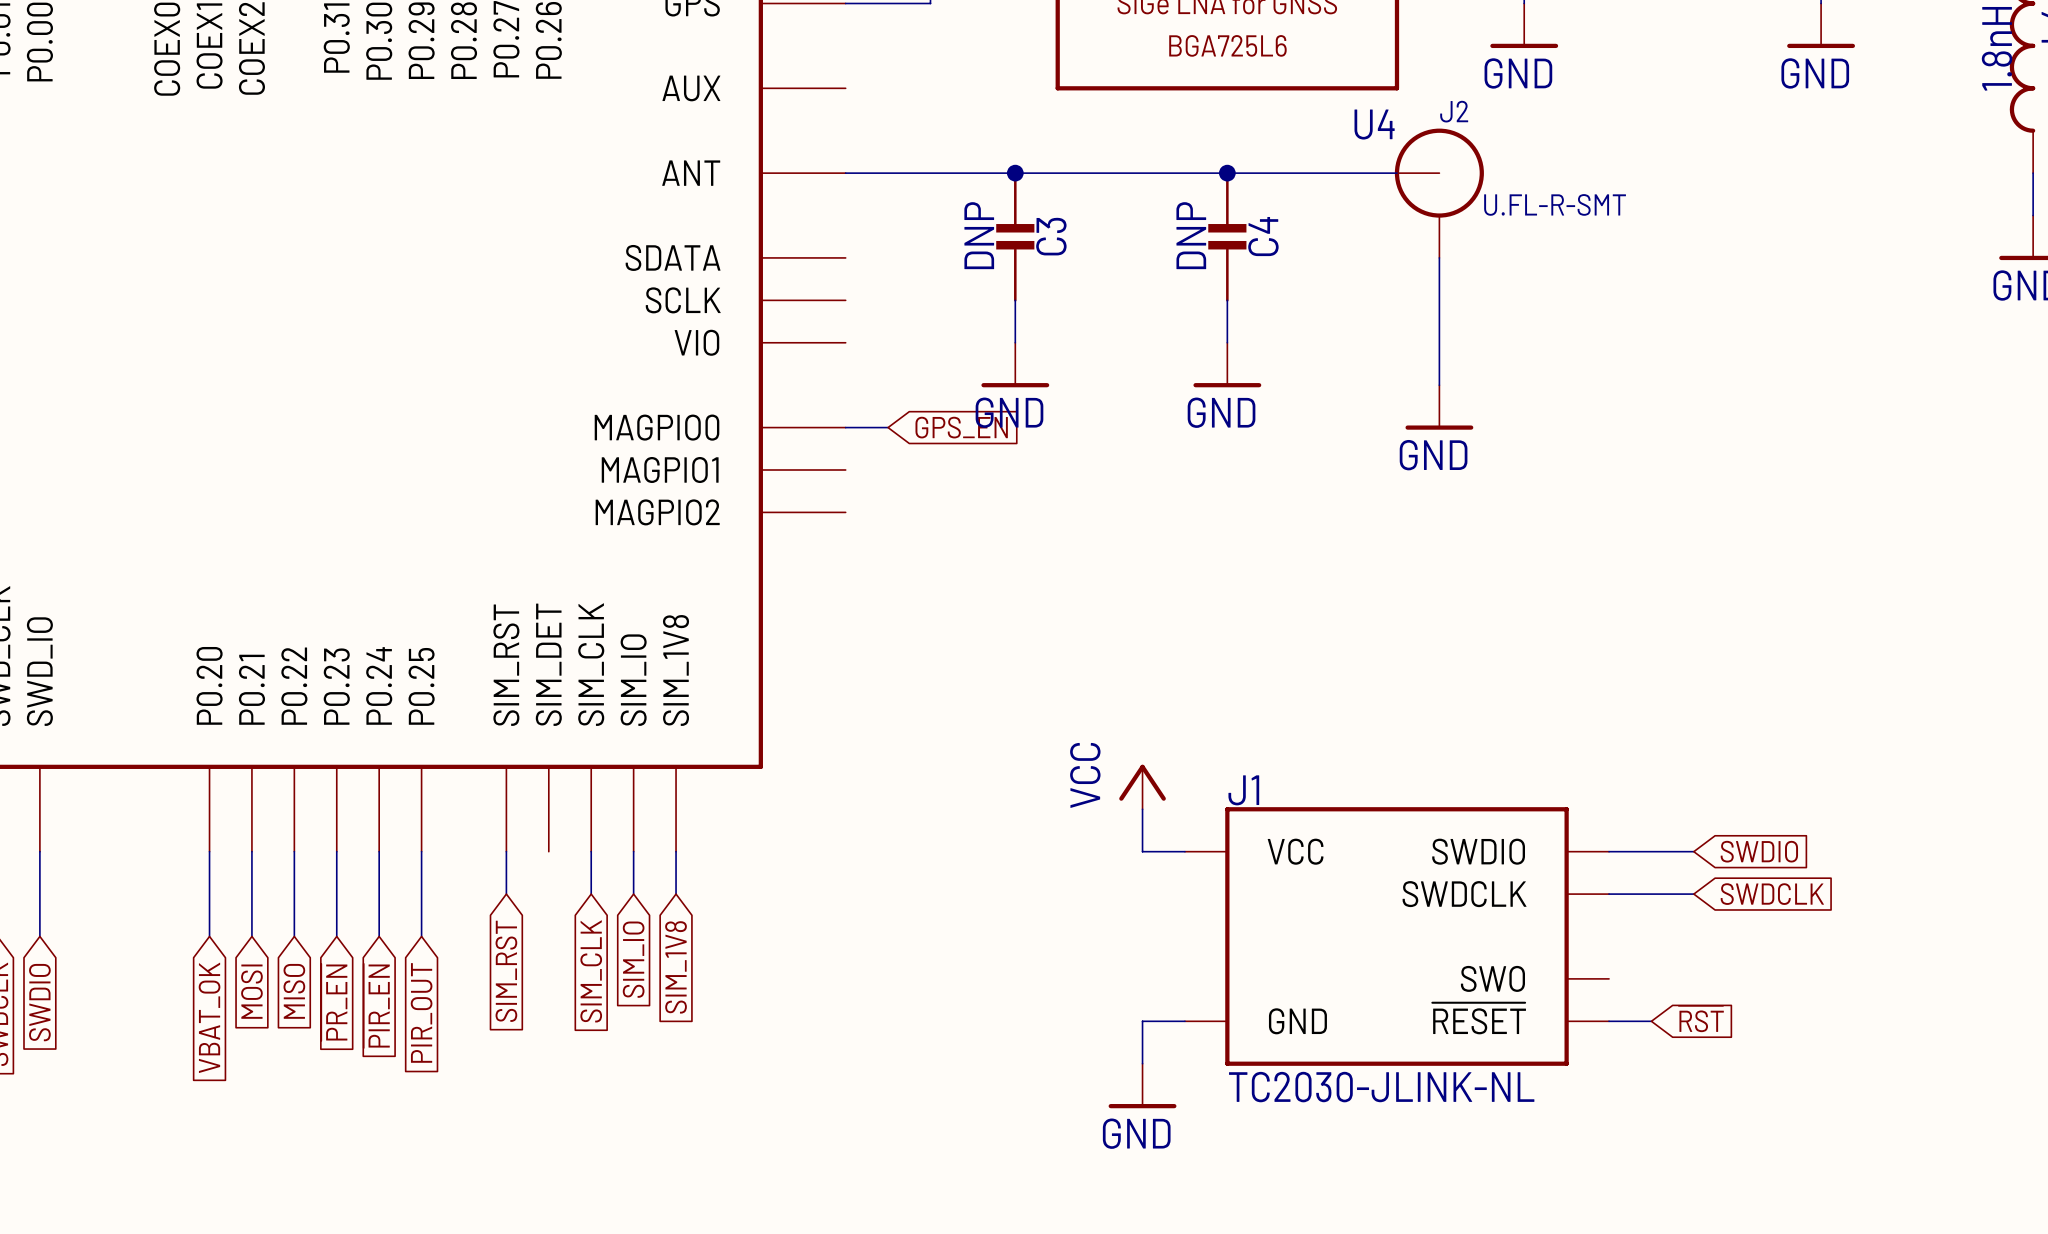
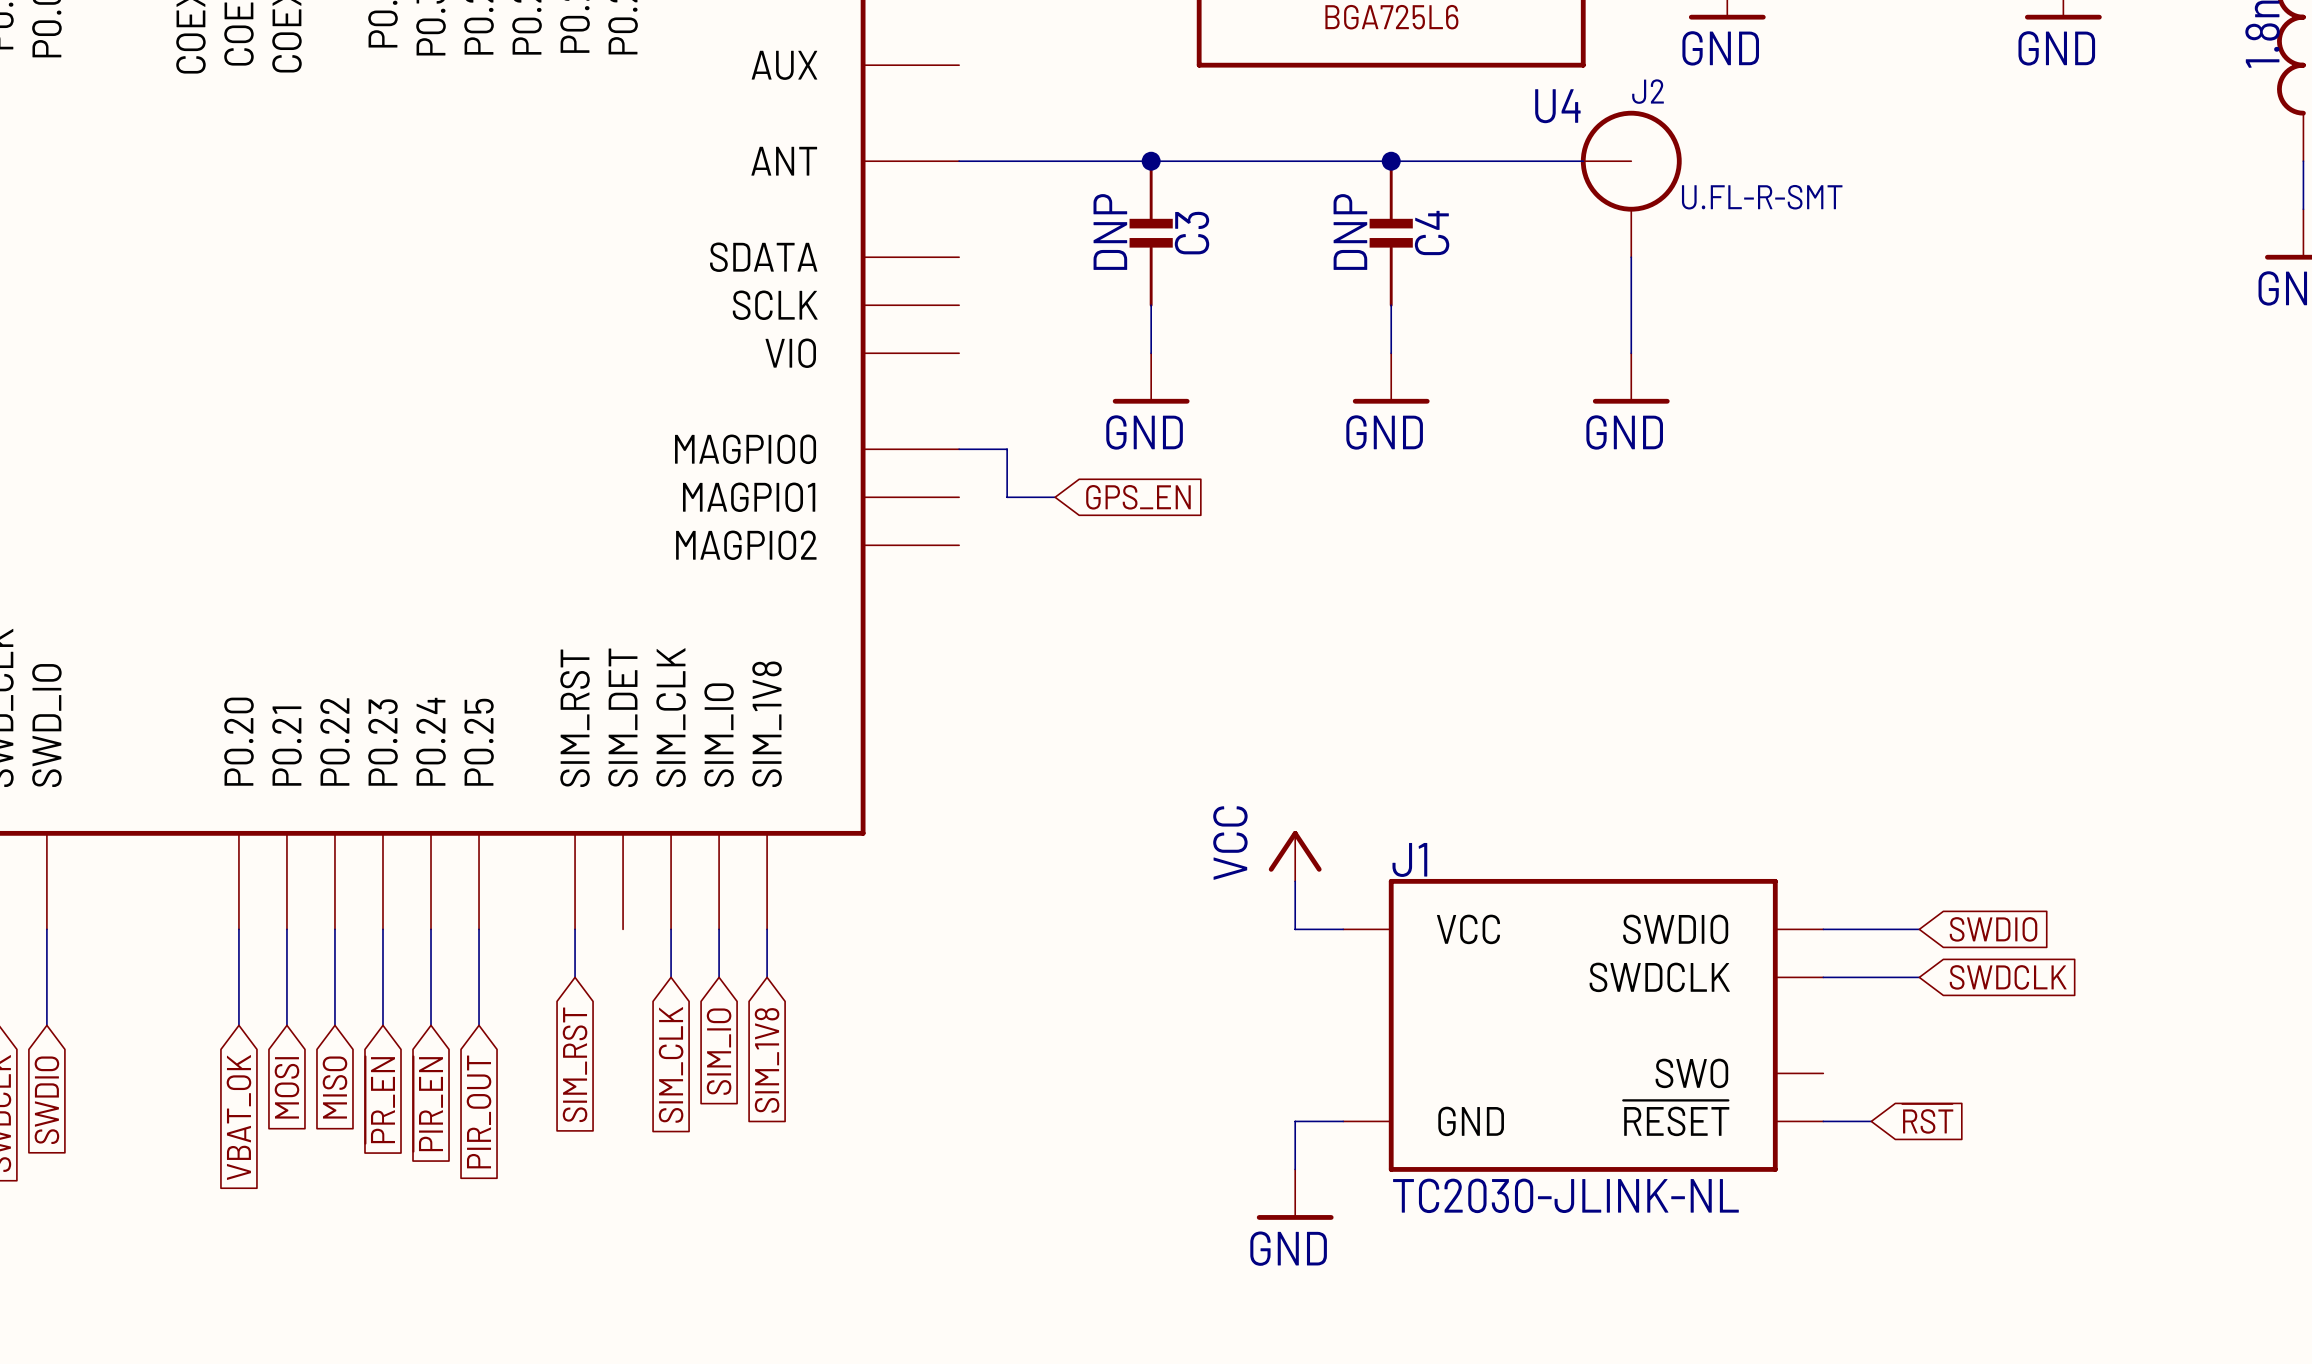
power symbol position: GND (1439, 407) -> GND (1631, 378)
wire: none -> (1007, 449) (1007, 497) (1055, 497)
global label position: GPS_EN (961, 427) -> GPS_EN (1138, 497)

